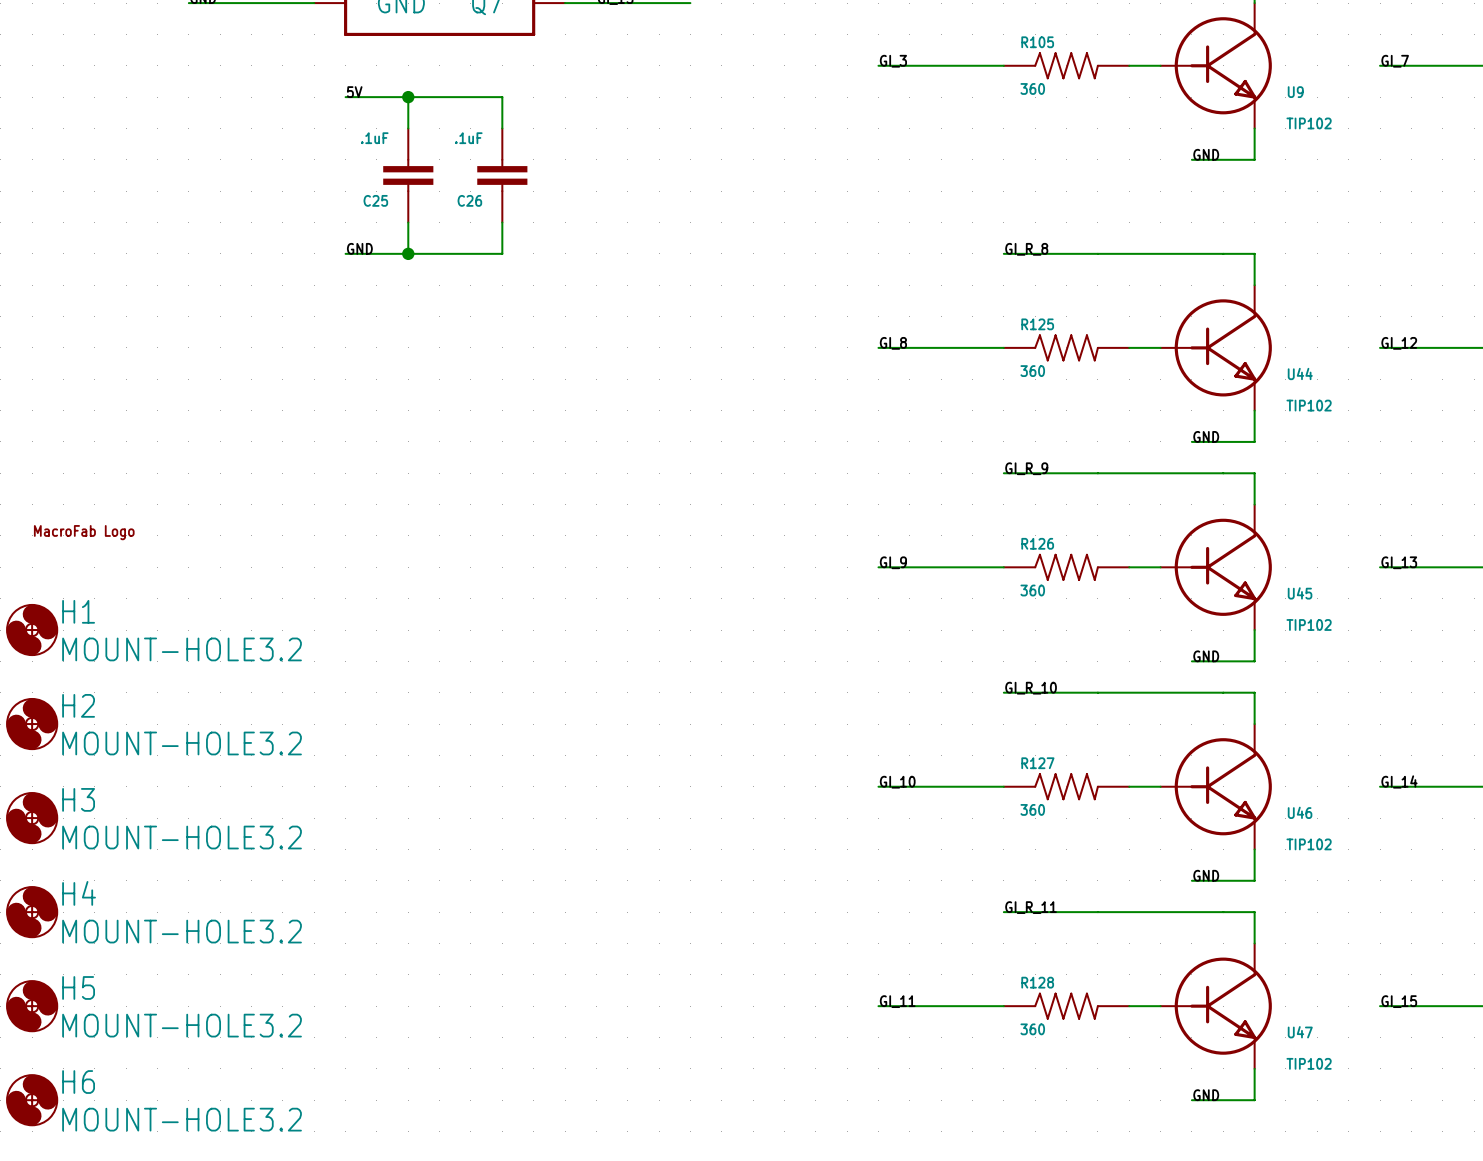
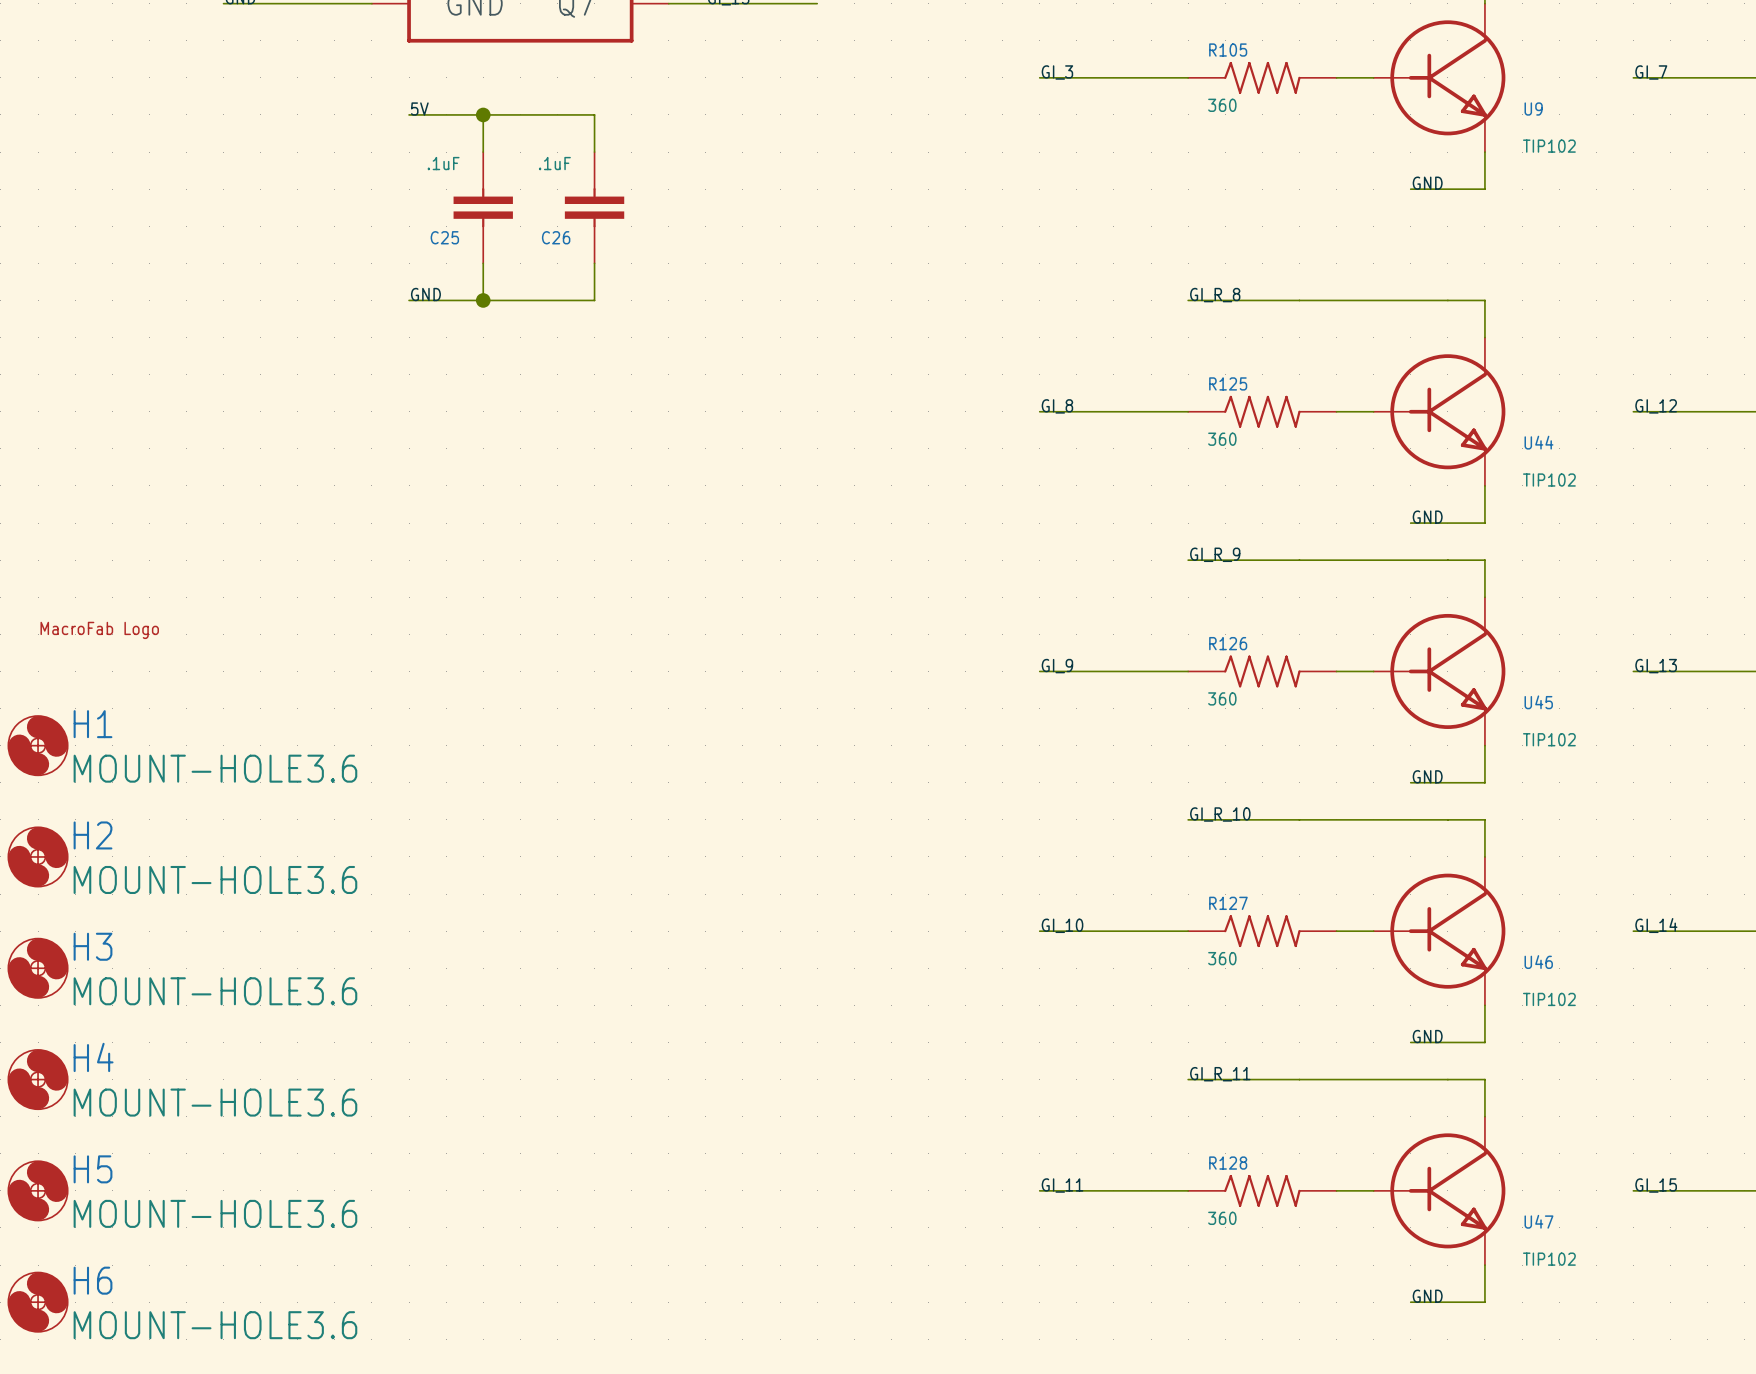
H1 value: MOUNT-HOLE3.2 (182, 649) -> MOUNT-HOLE3.6 (215, 768)
H2 value: MOUNT-HOLE3.2 (182, 743) -> MOUNT-HOLE3.6 (215, 879)
H3 value: MOUNT-HOLE3.2 (182, 837) -> MOUNT-HOLE3.6 (215, 991)
H4 value: MOUNT-HOLE3.2 (182, 931) -> MOUNT-HOLE3.6 (215, 1102)
H5 value: MOUNT-HOLE3.2 (182, 1025) -> MOUNT-HOLE3.6 (215, 1213)
H6 value: MOUNT-HOLE3.2 (182, 1119) -> MOUNT-HOLE3.6 (215, 1325)

